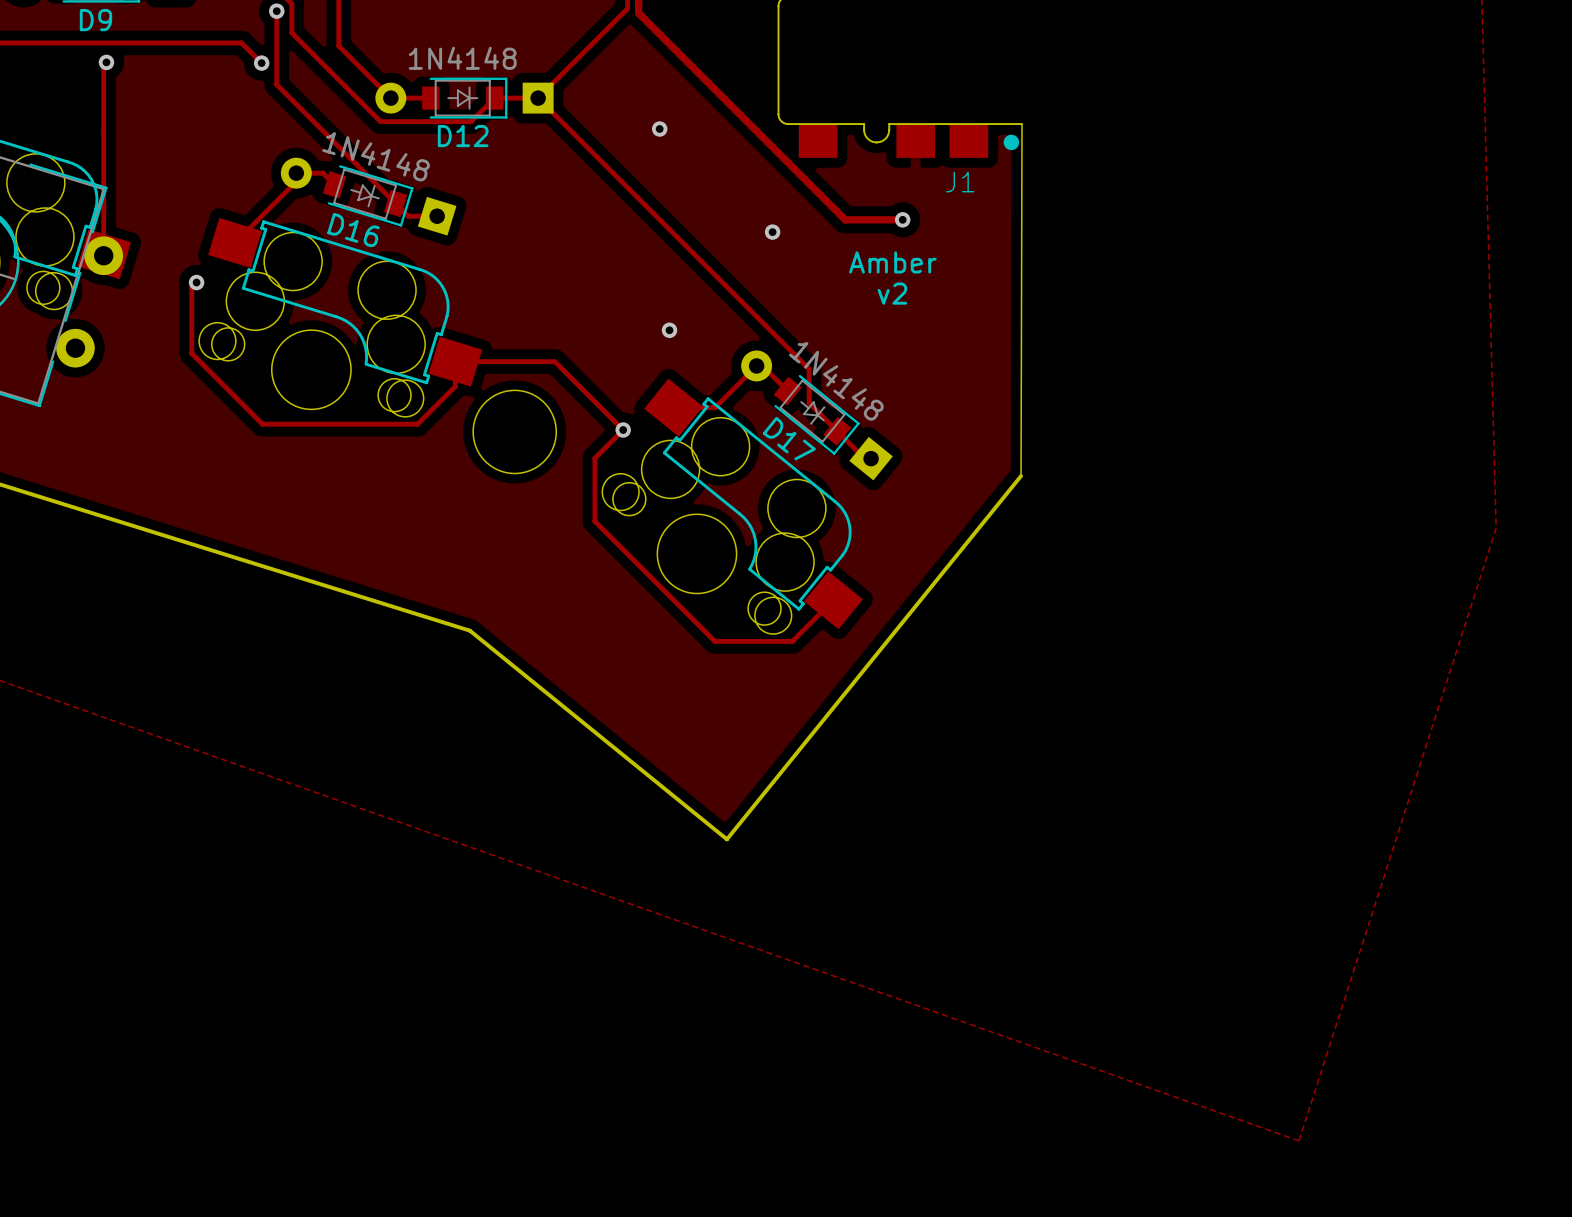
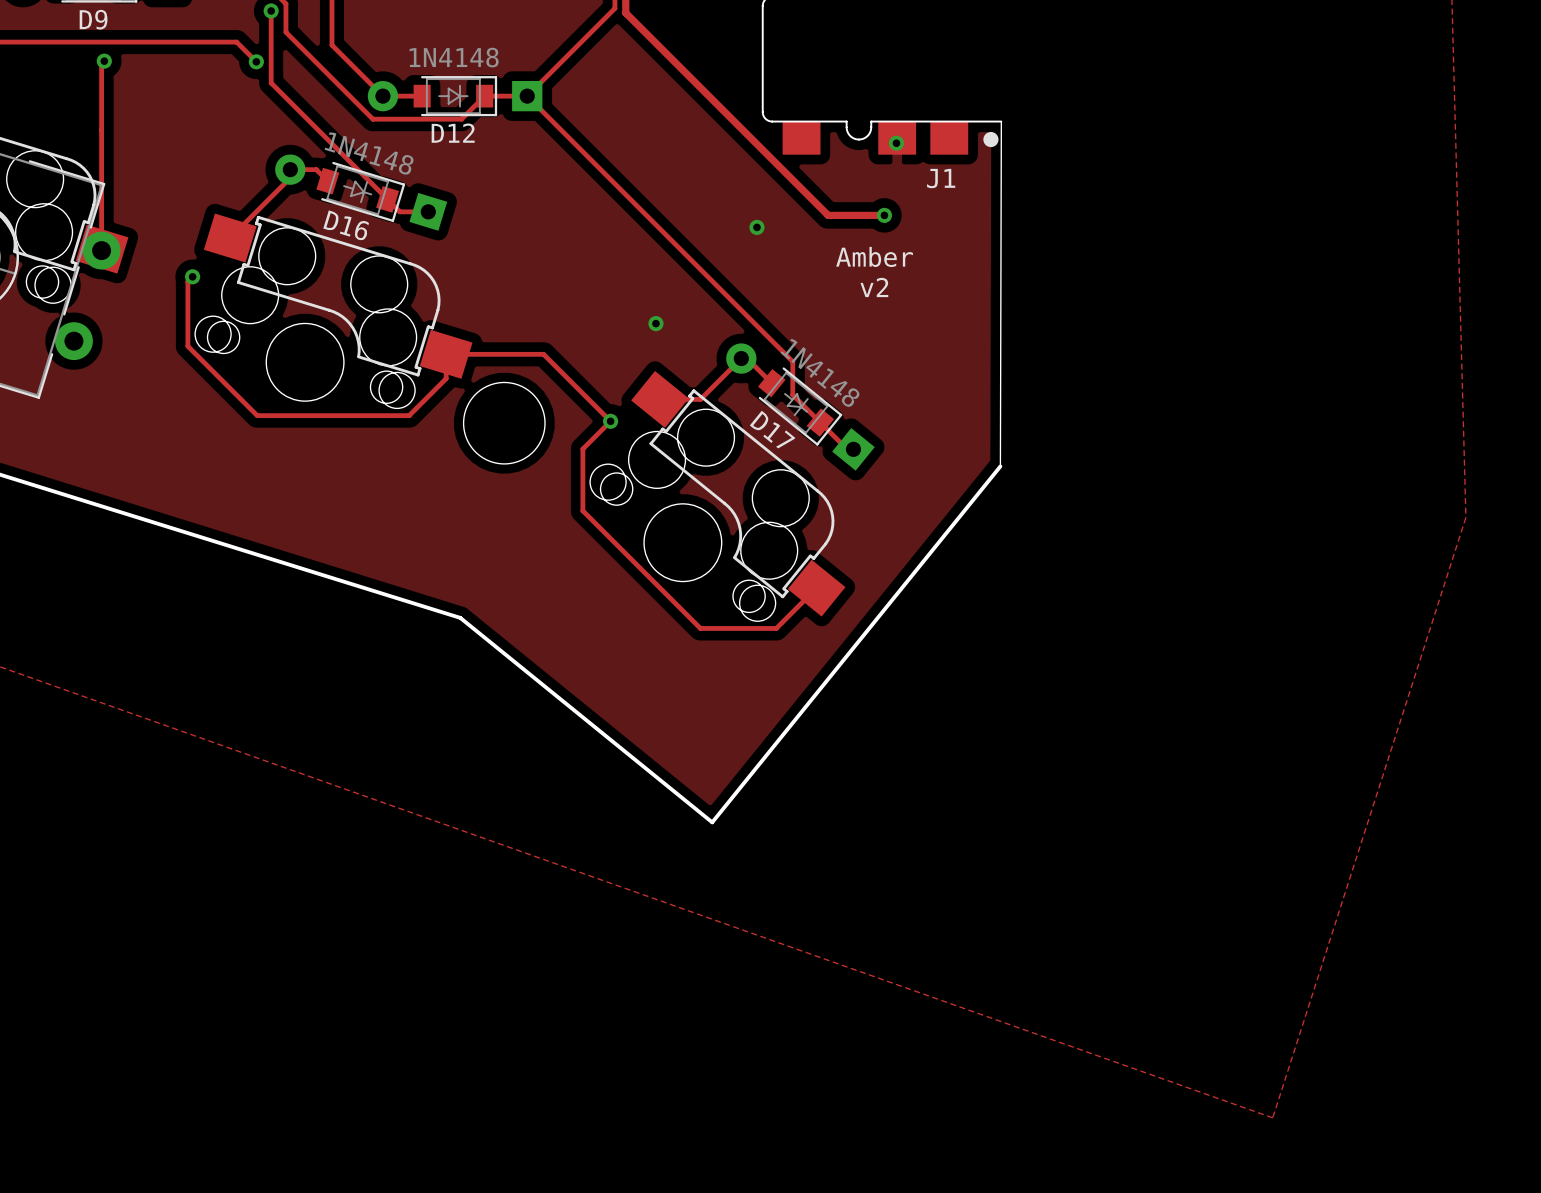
via: (659, 129) -> none
via: none -> (896, 143)

